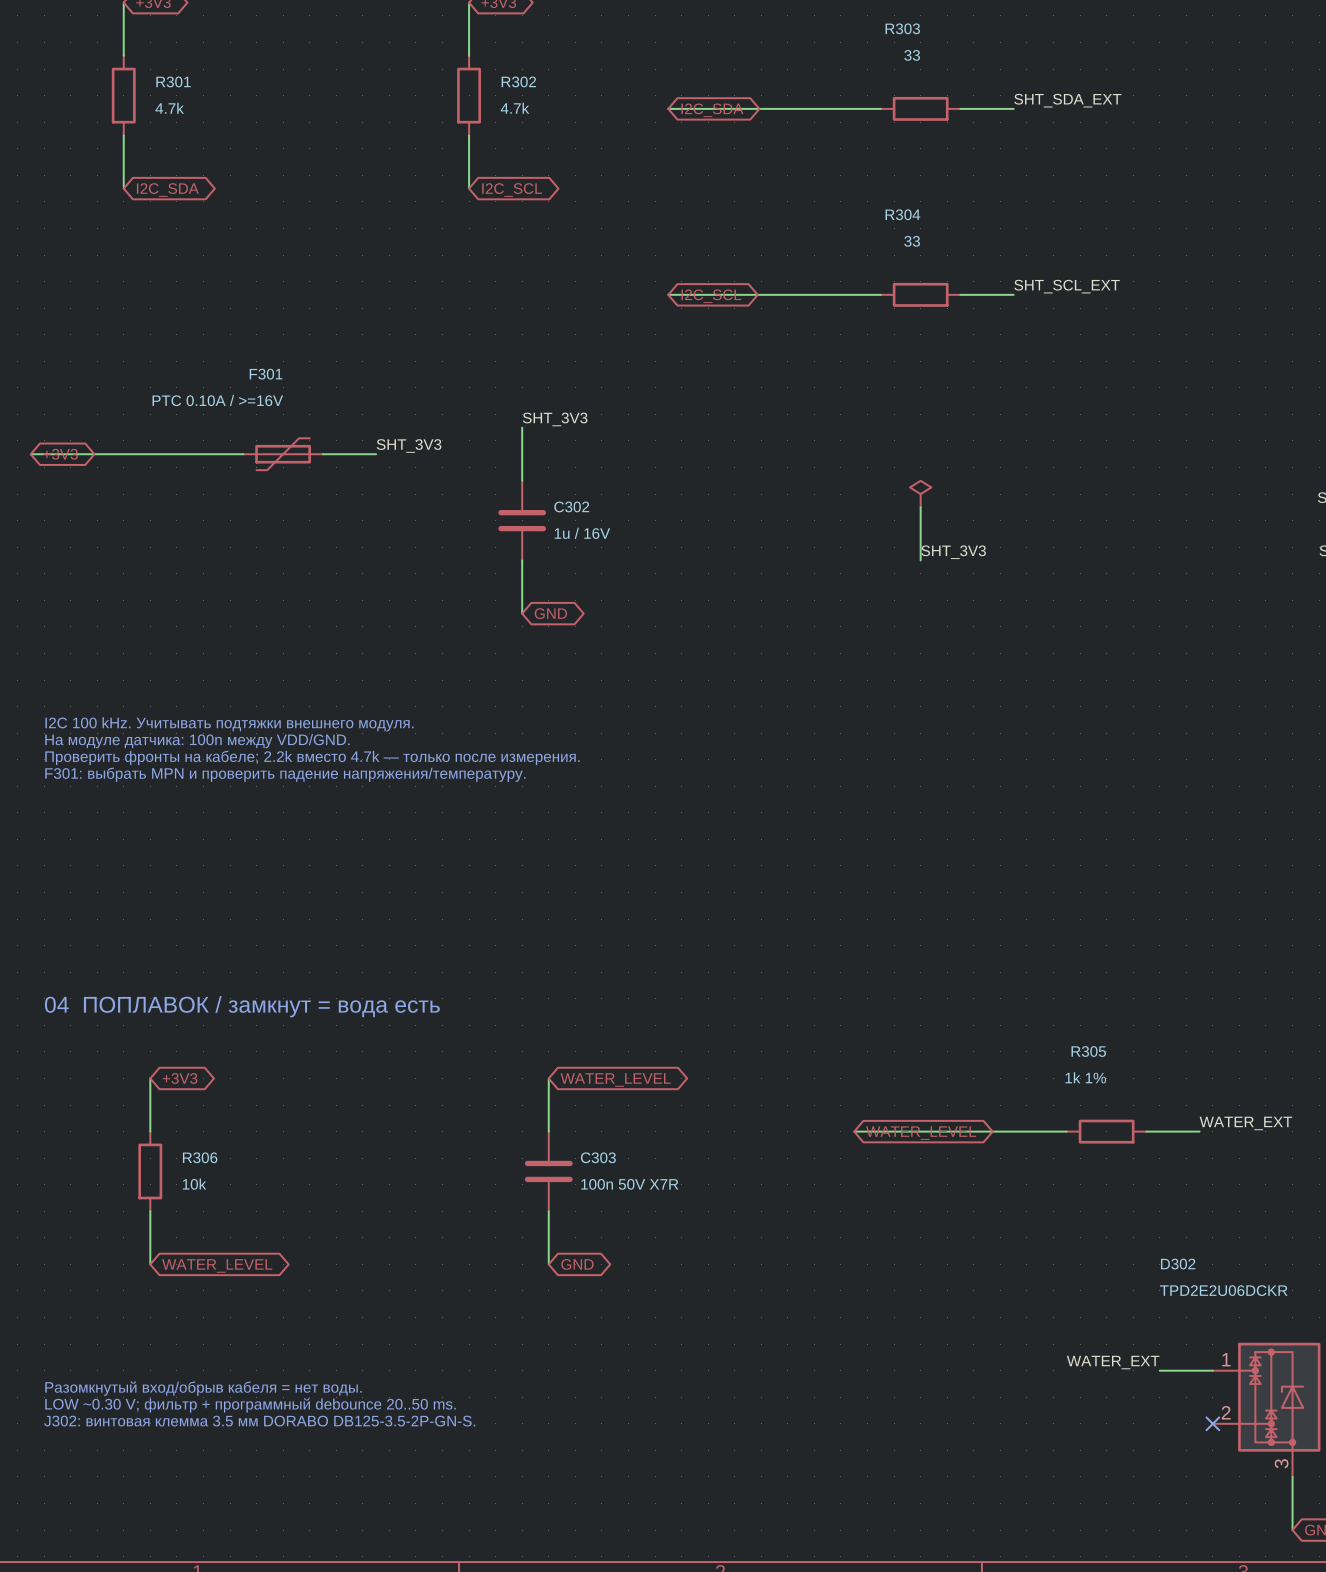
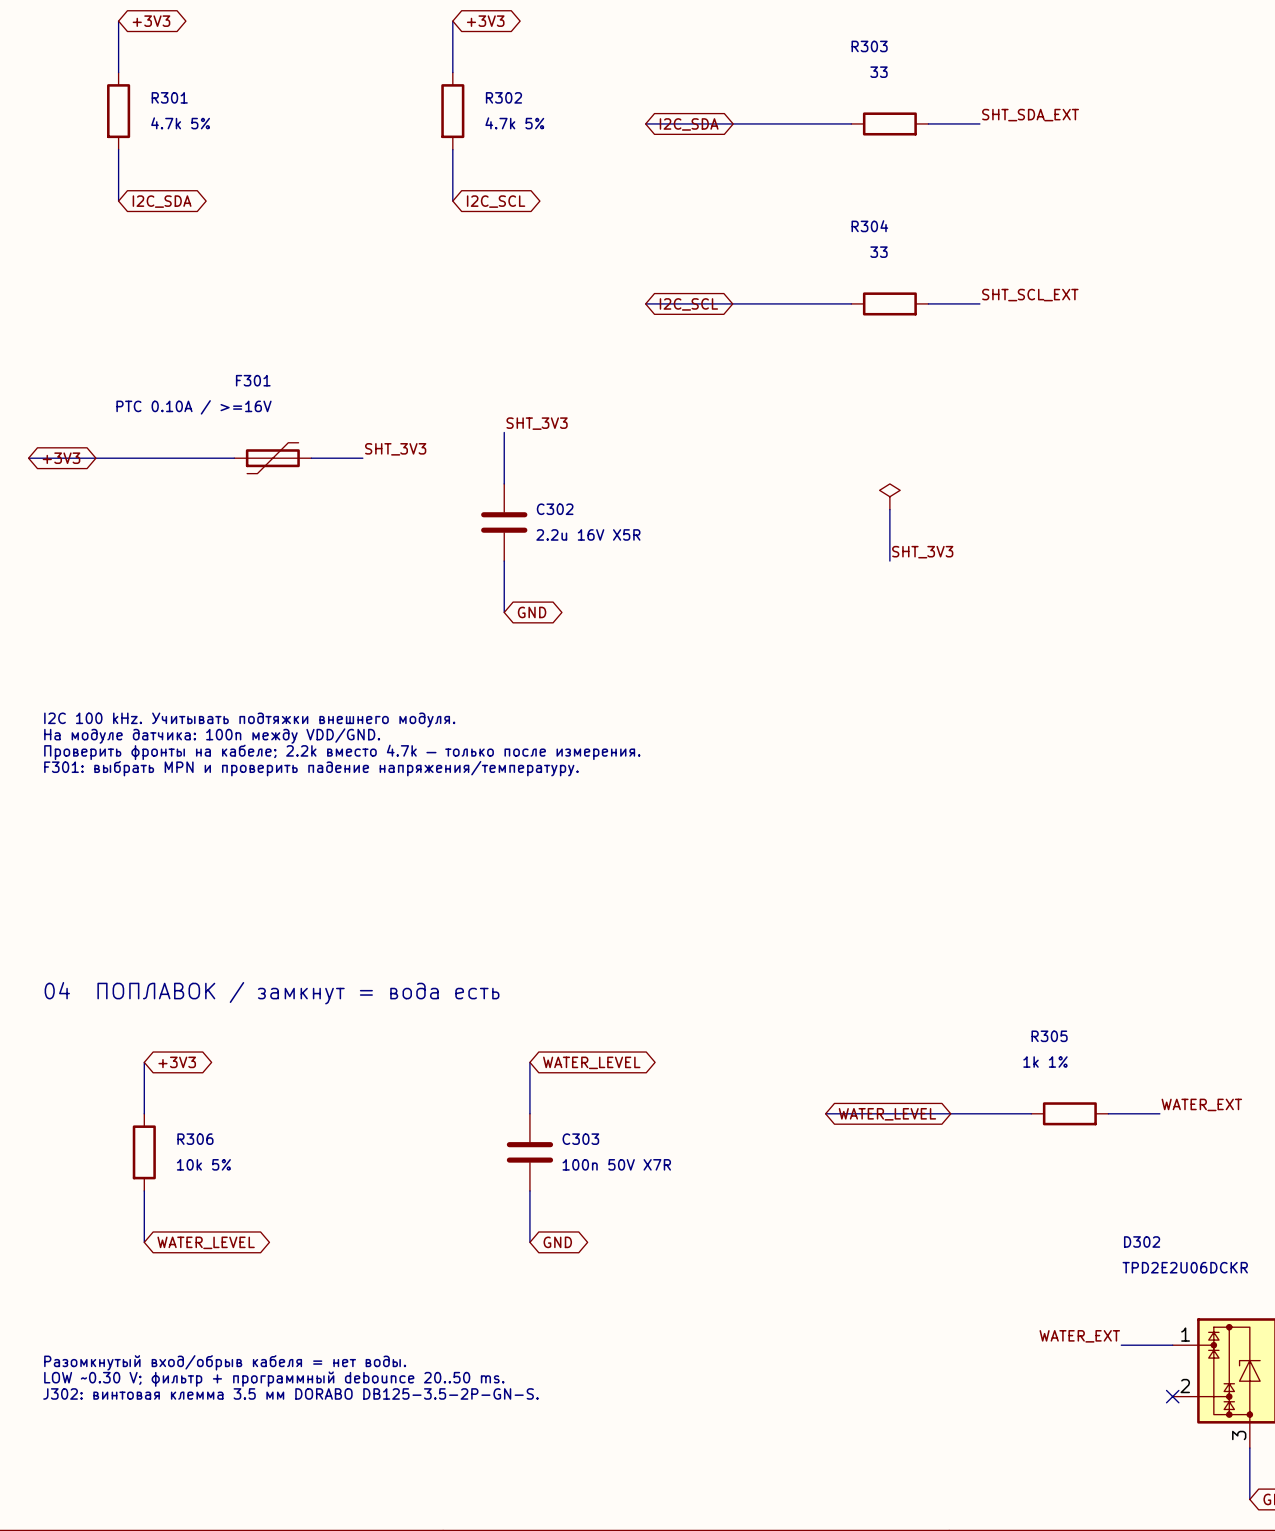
R301 value: 4.7k (169, 108) -> 4.7k 5% (180, 123)
R302 value: 4.7k (515, 108) -> 4.7k 5% (514, 123)
C302 value: 1u / 16V (582, 533) -> 2.2u 16V X5R (588, 534)
R306 value: 10k (194, 1184) -> 10k 5% (203, 1164)

